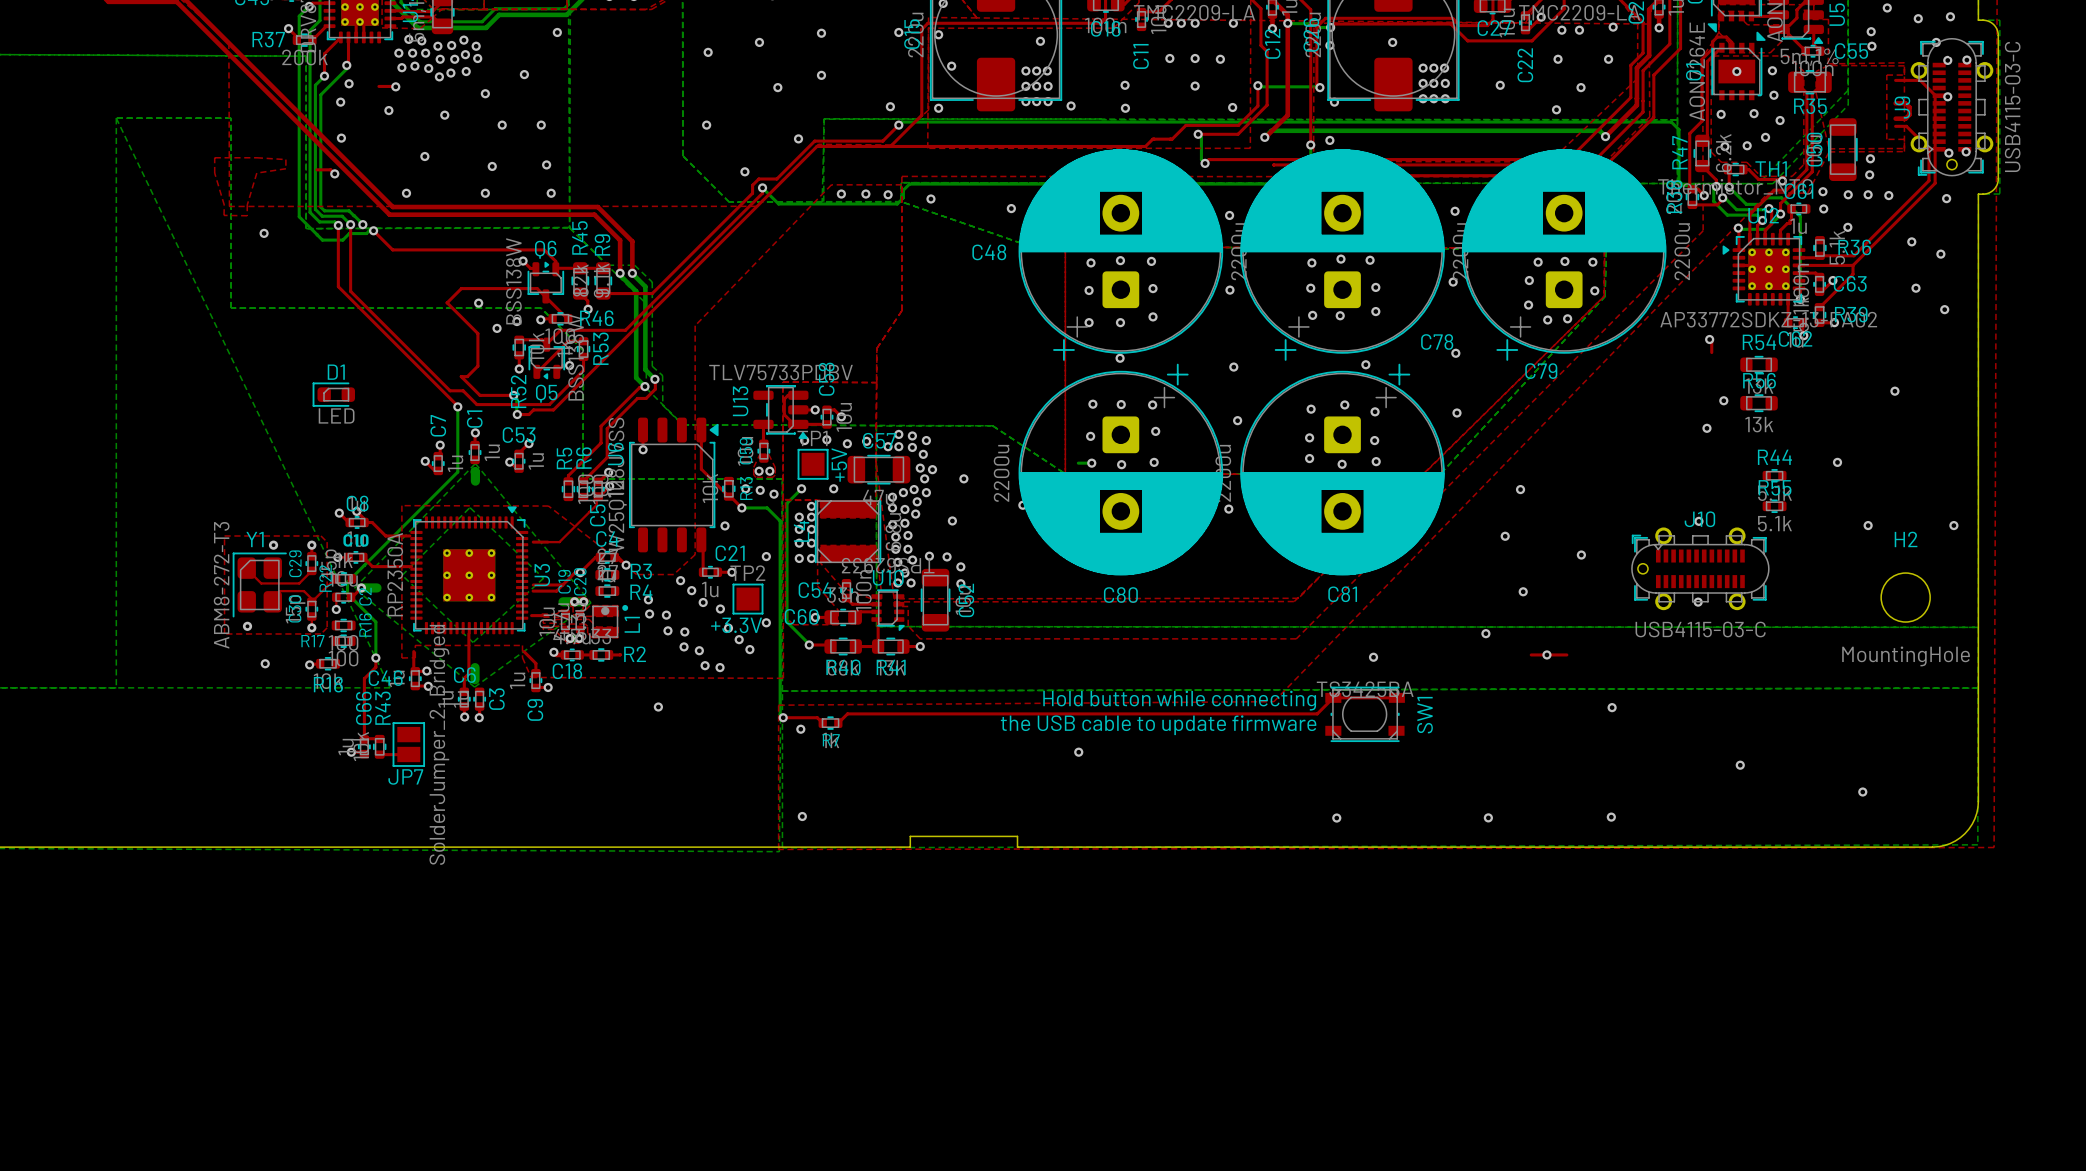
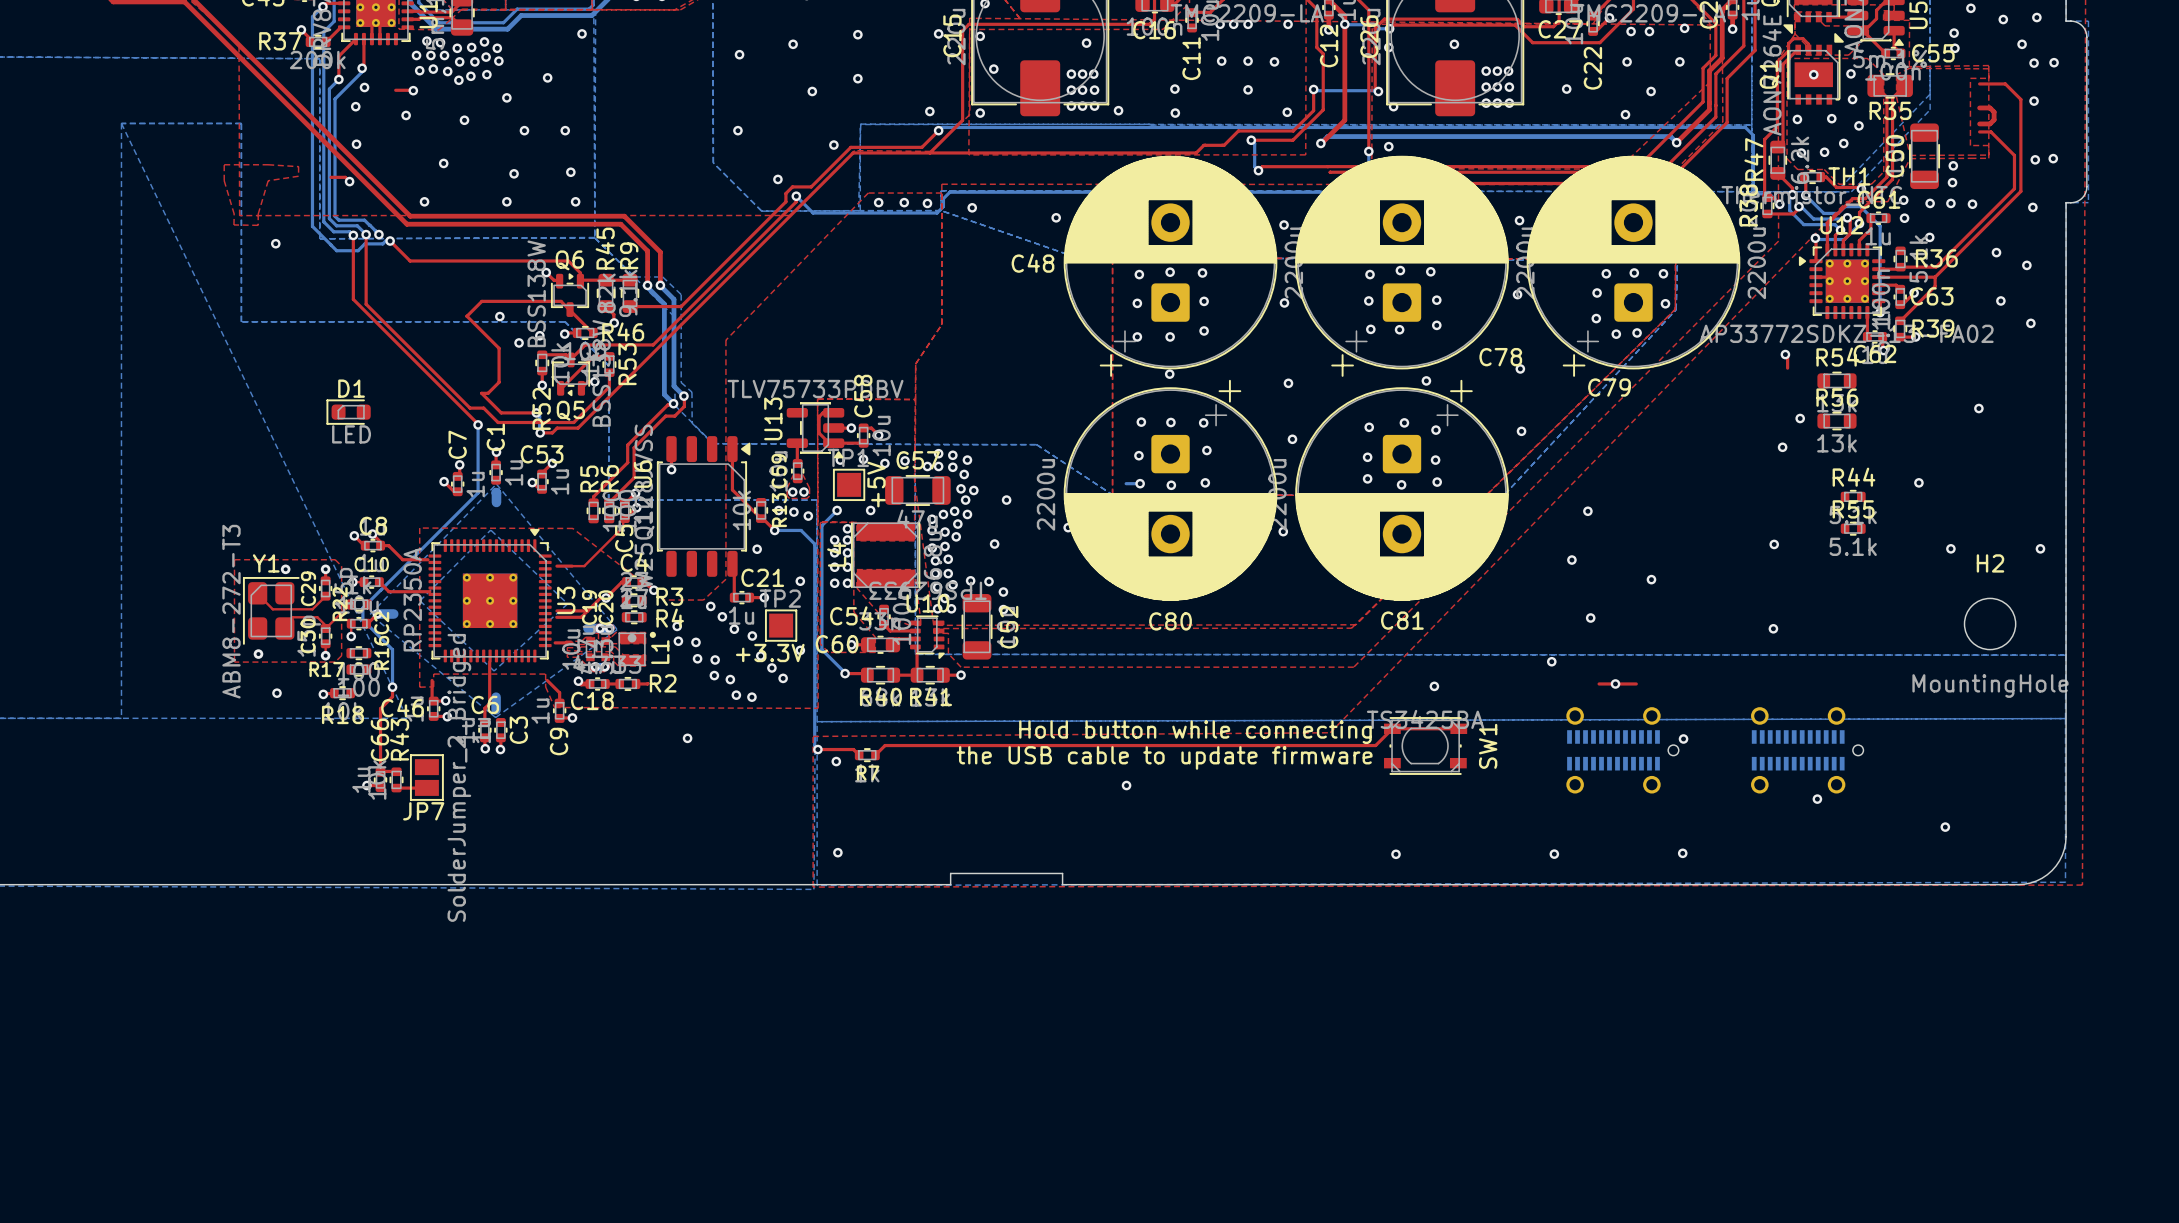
J9: USB4115-03-C (1951, 107) -> none
J10 side: top (1700, 568) -> bottom (1612, 750)
part: none -> (1796, 750)

